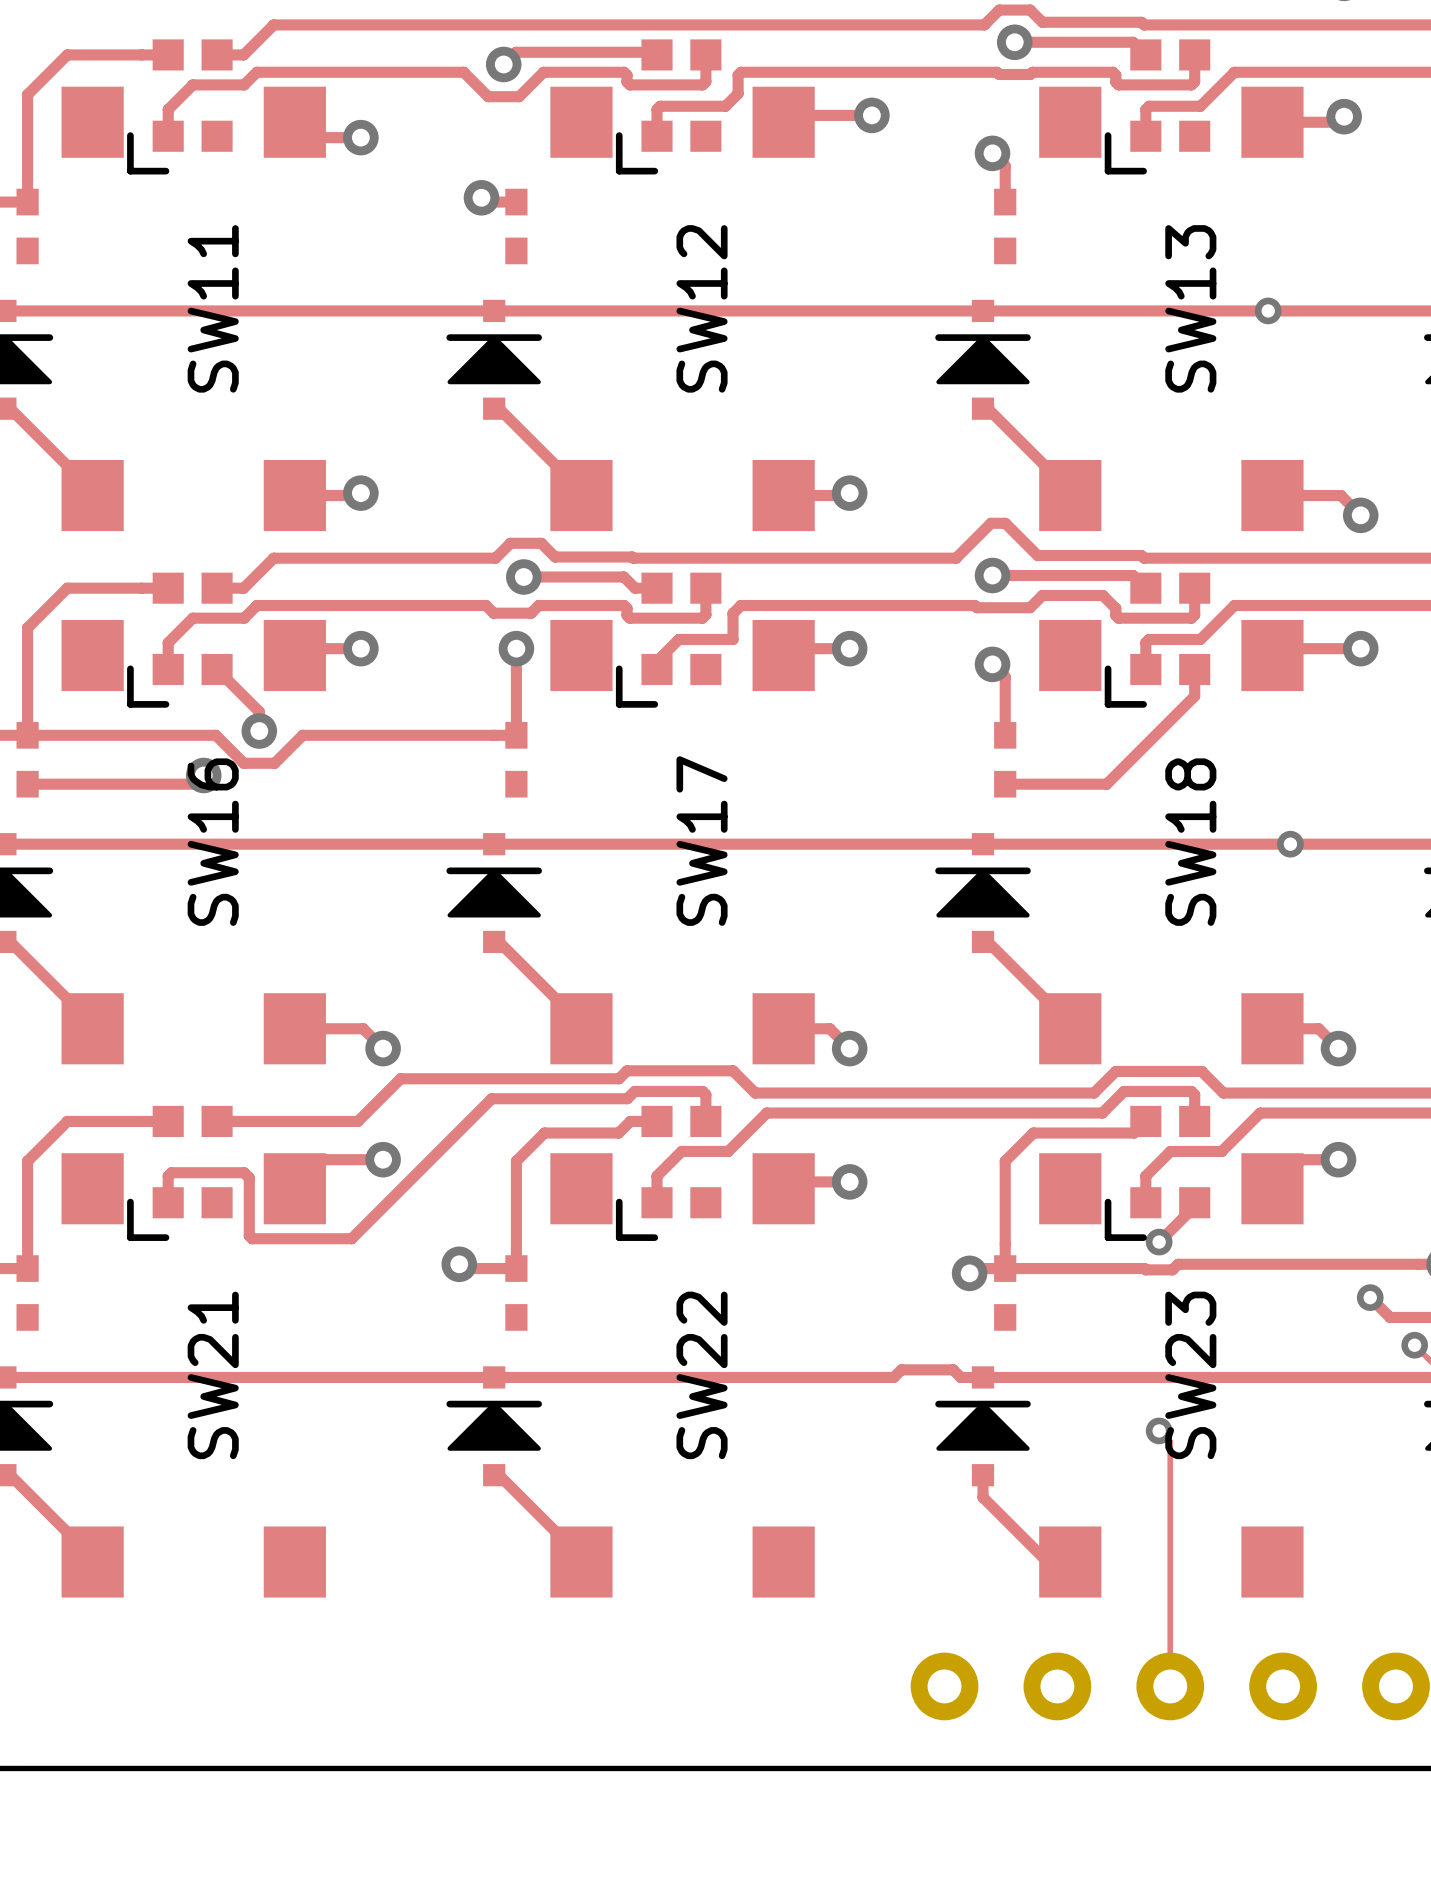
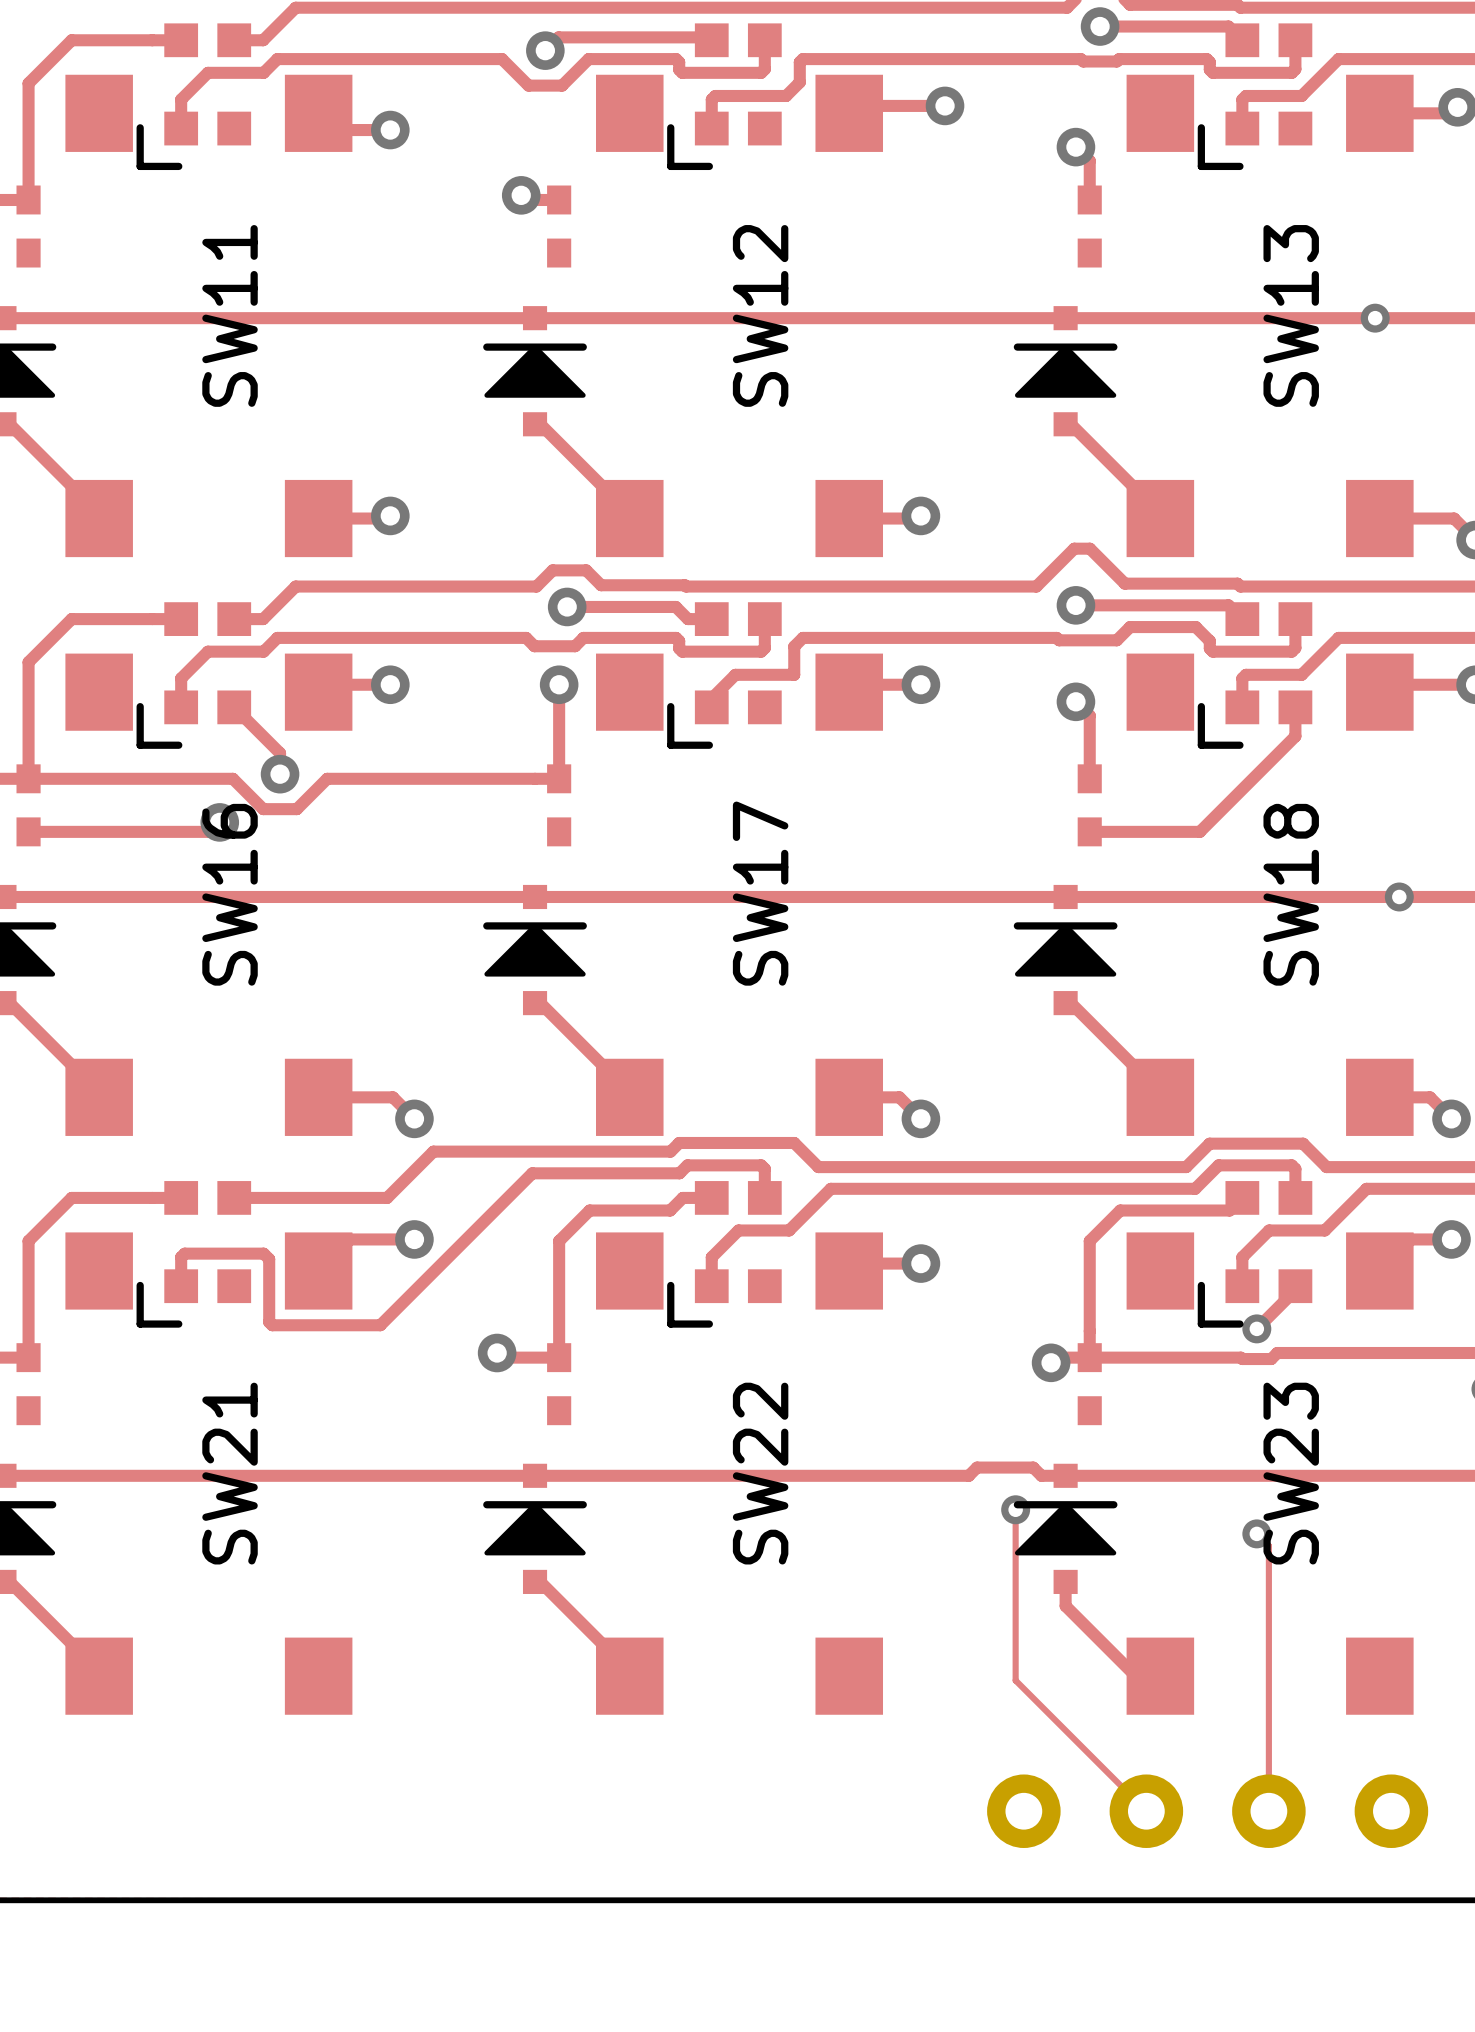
track: none -> (1015, 1509) (1015, 1680) (1146, 1811)
via: none -> (1015, 1509)

